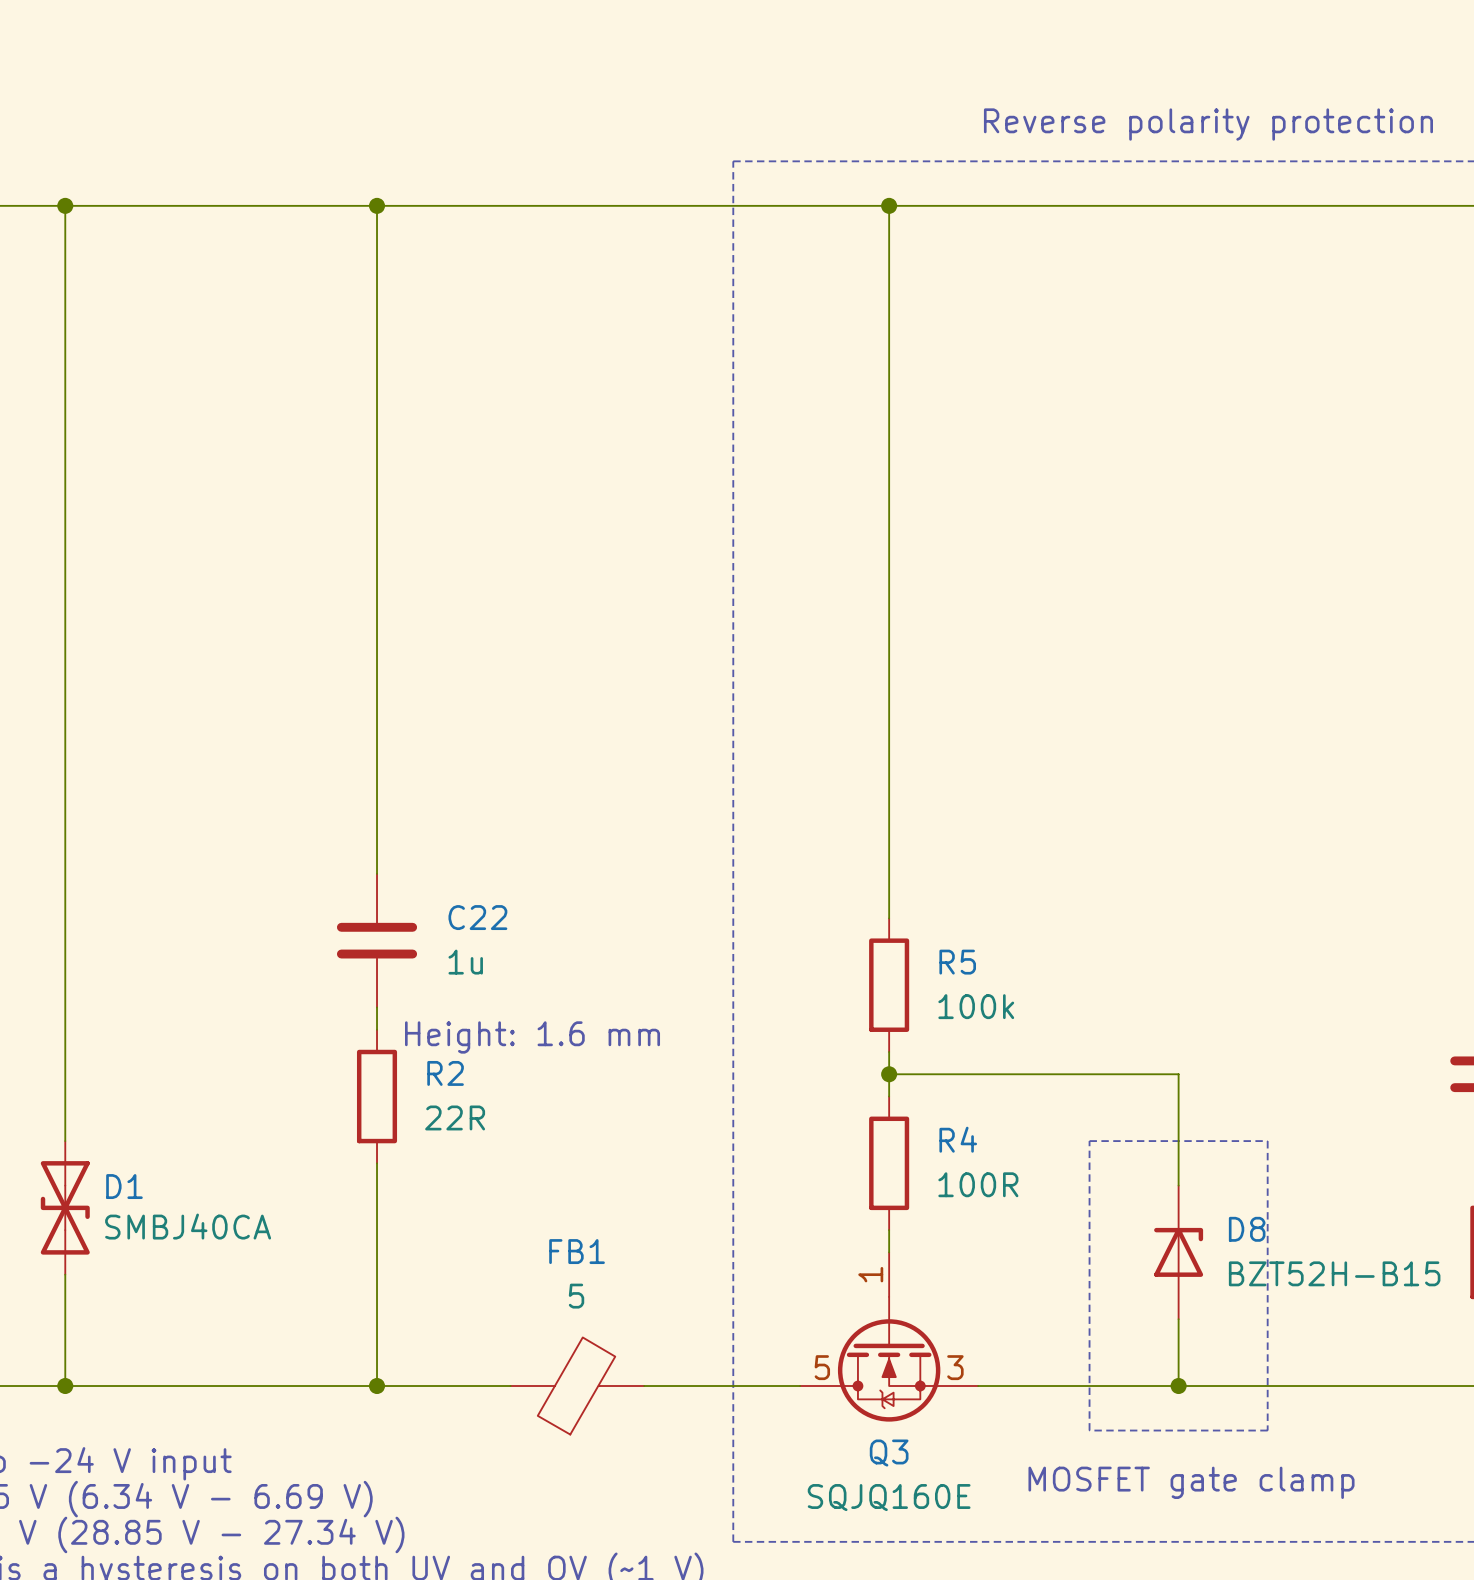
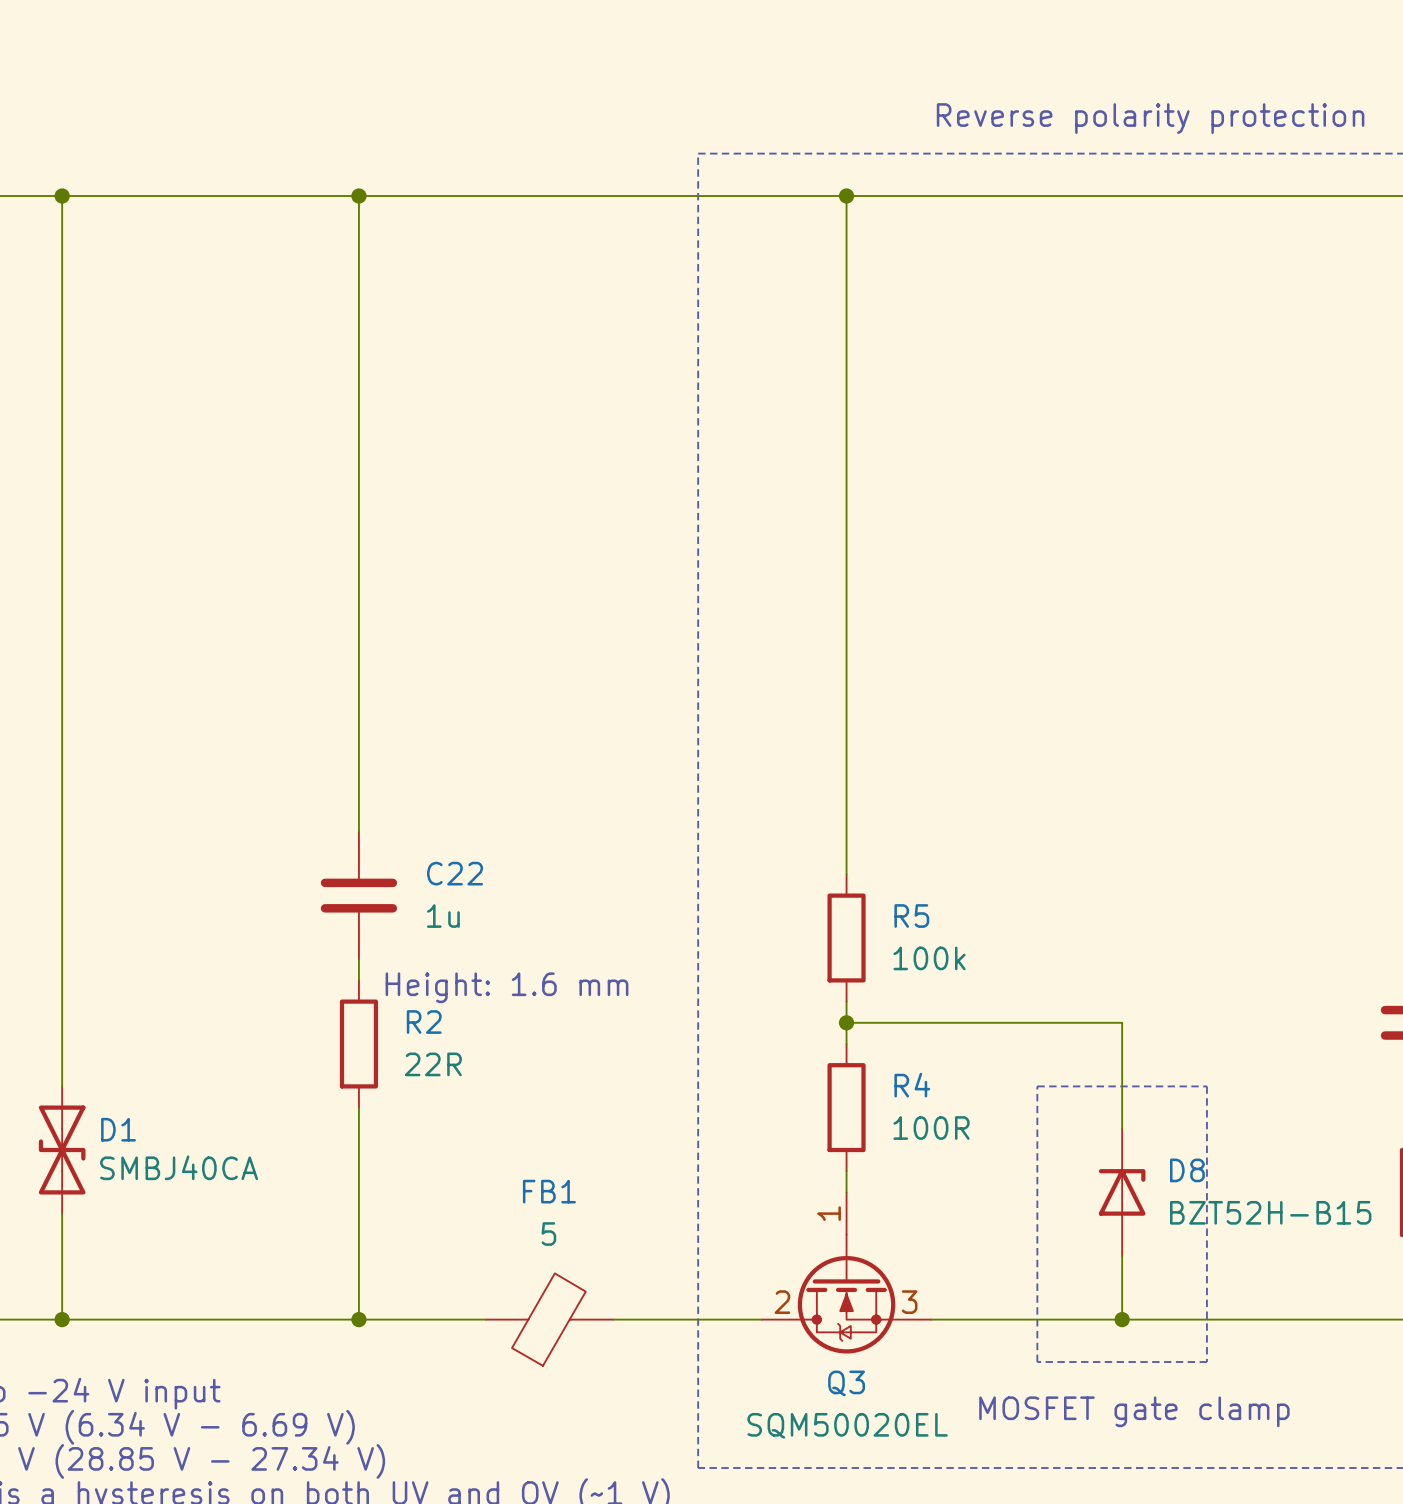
Q3 pin number: 5 (822, 1367) -> 2 (782, 1302)
Q3 value: SQJQ160E (889, 1497) -> SQM50020EL (847, 1425)

